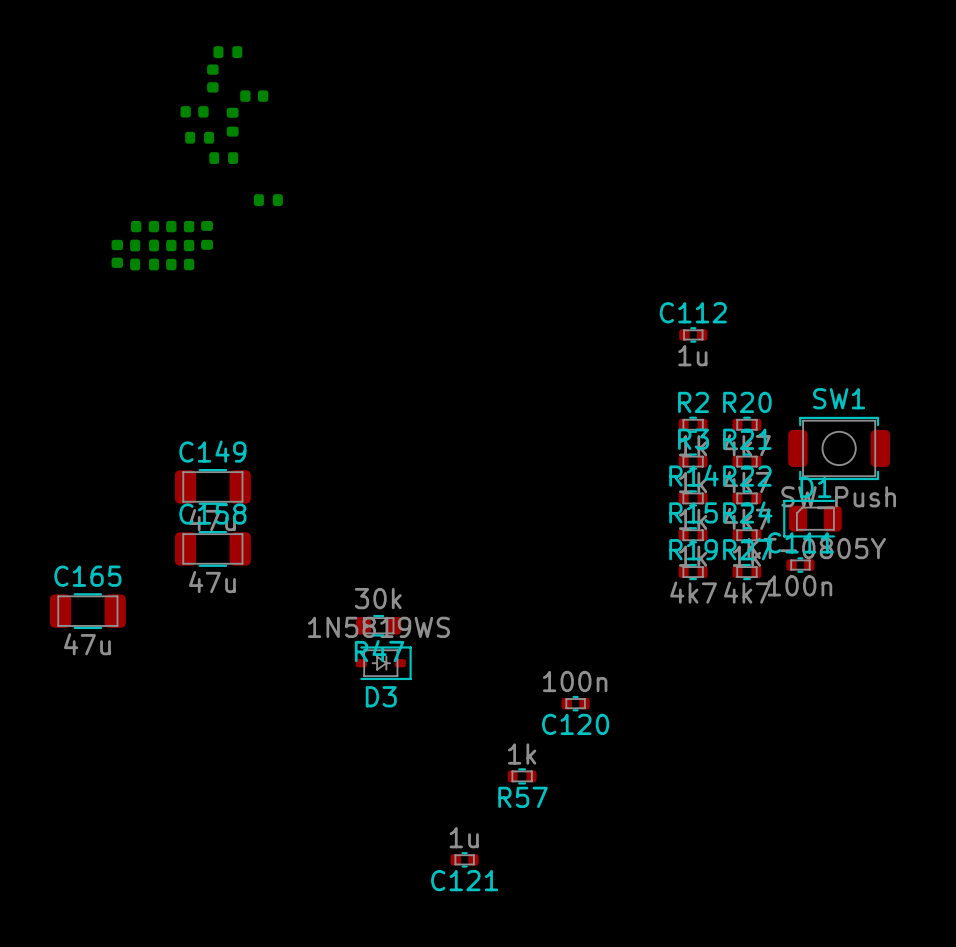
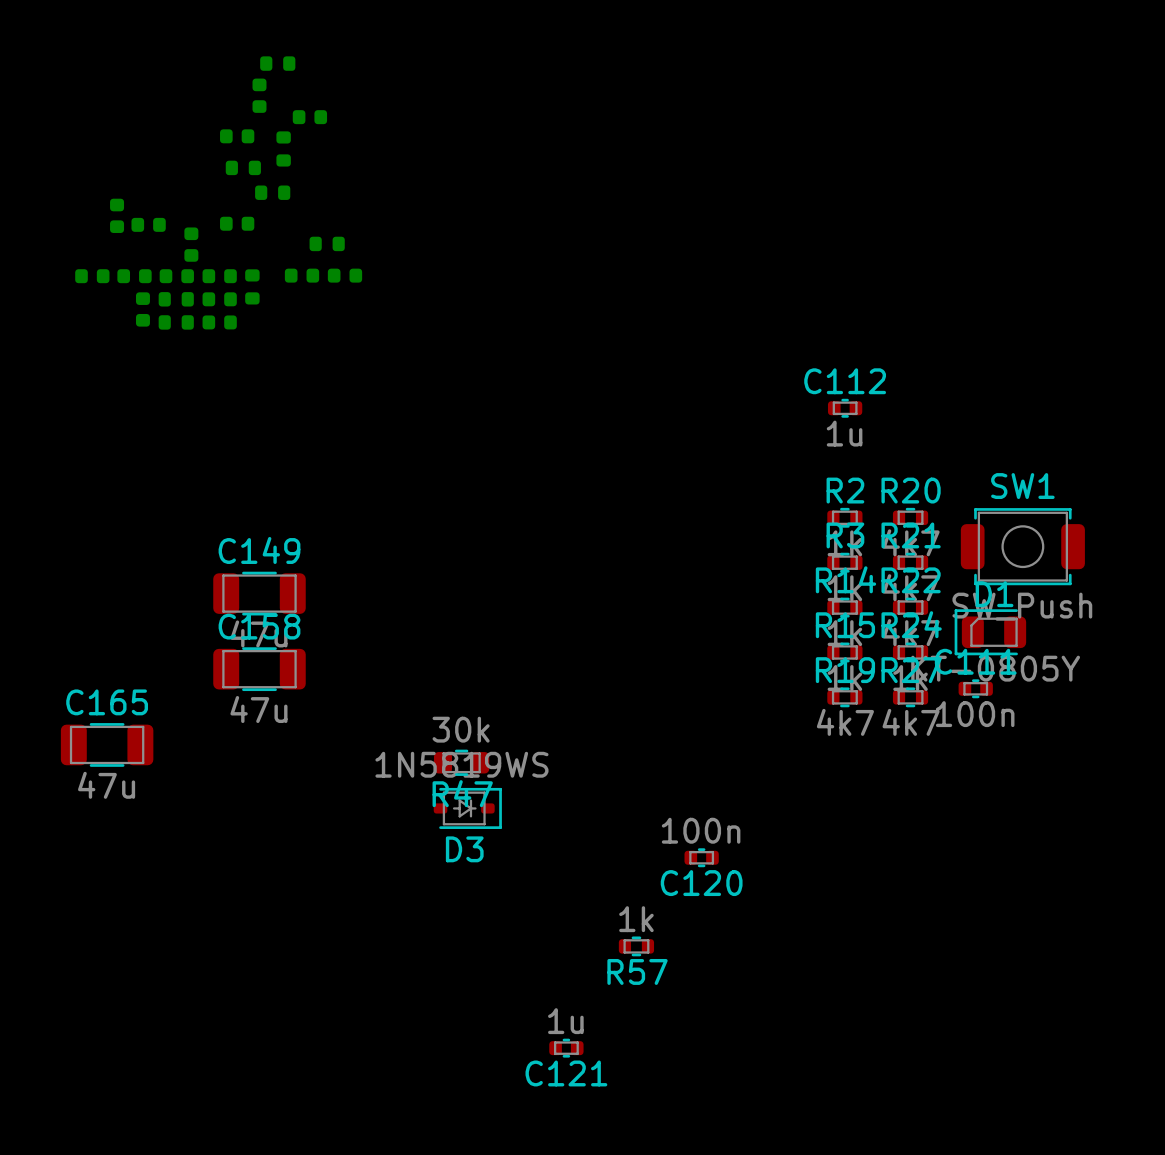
part: none -> (117, 215)
part: none -> (237, 223)
part: none -> (148, 224)
part: none -> (191, 244)
part: none -> (92, 276)
part: none -> (134, 276)
part: none -> (302, 275)
part: none -> (344, 275)

